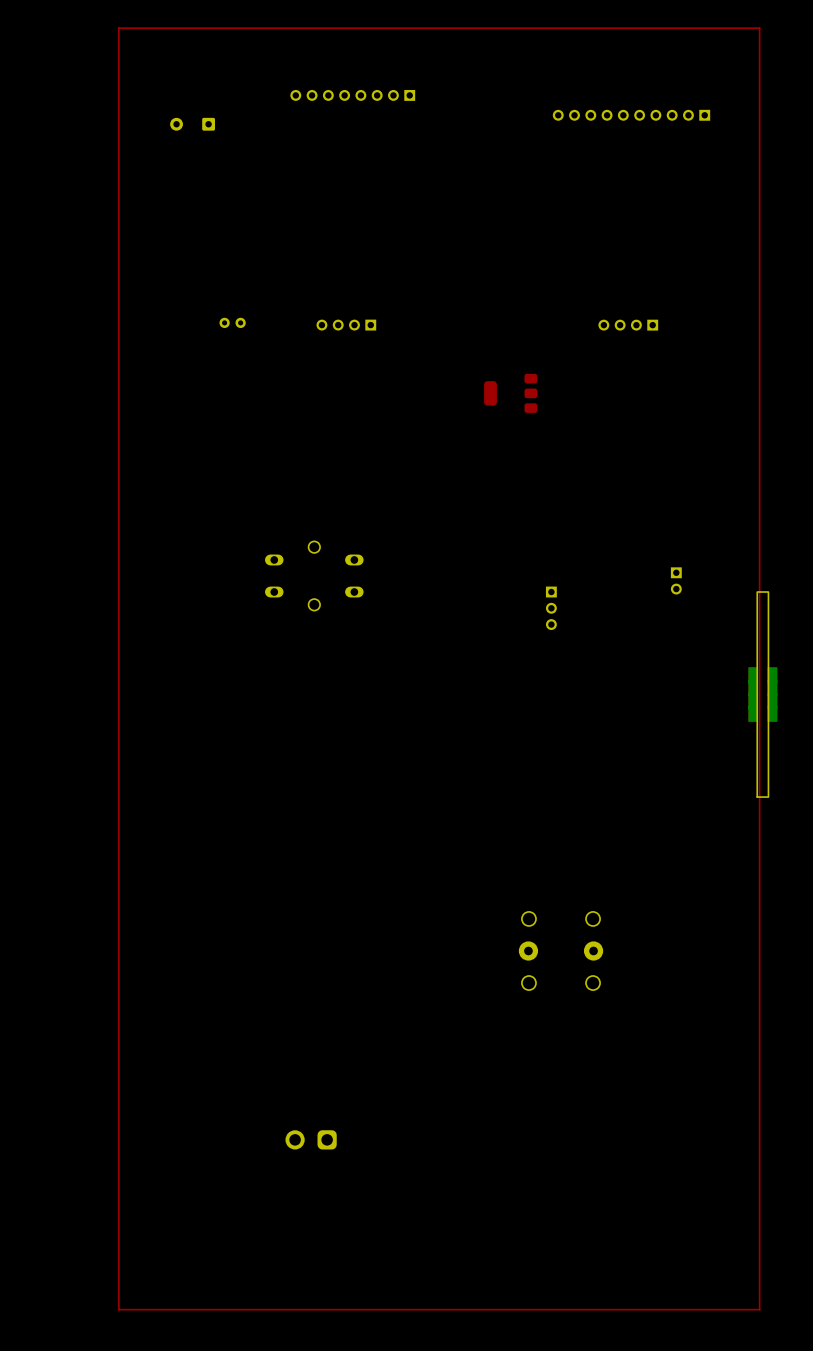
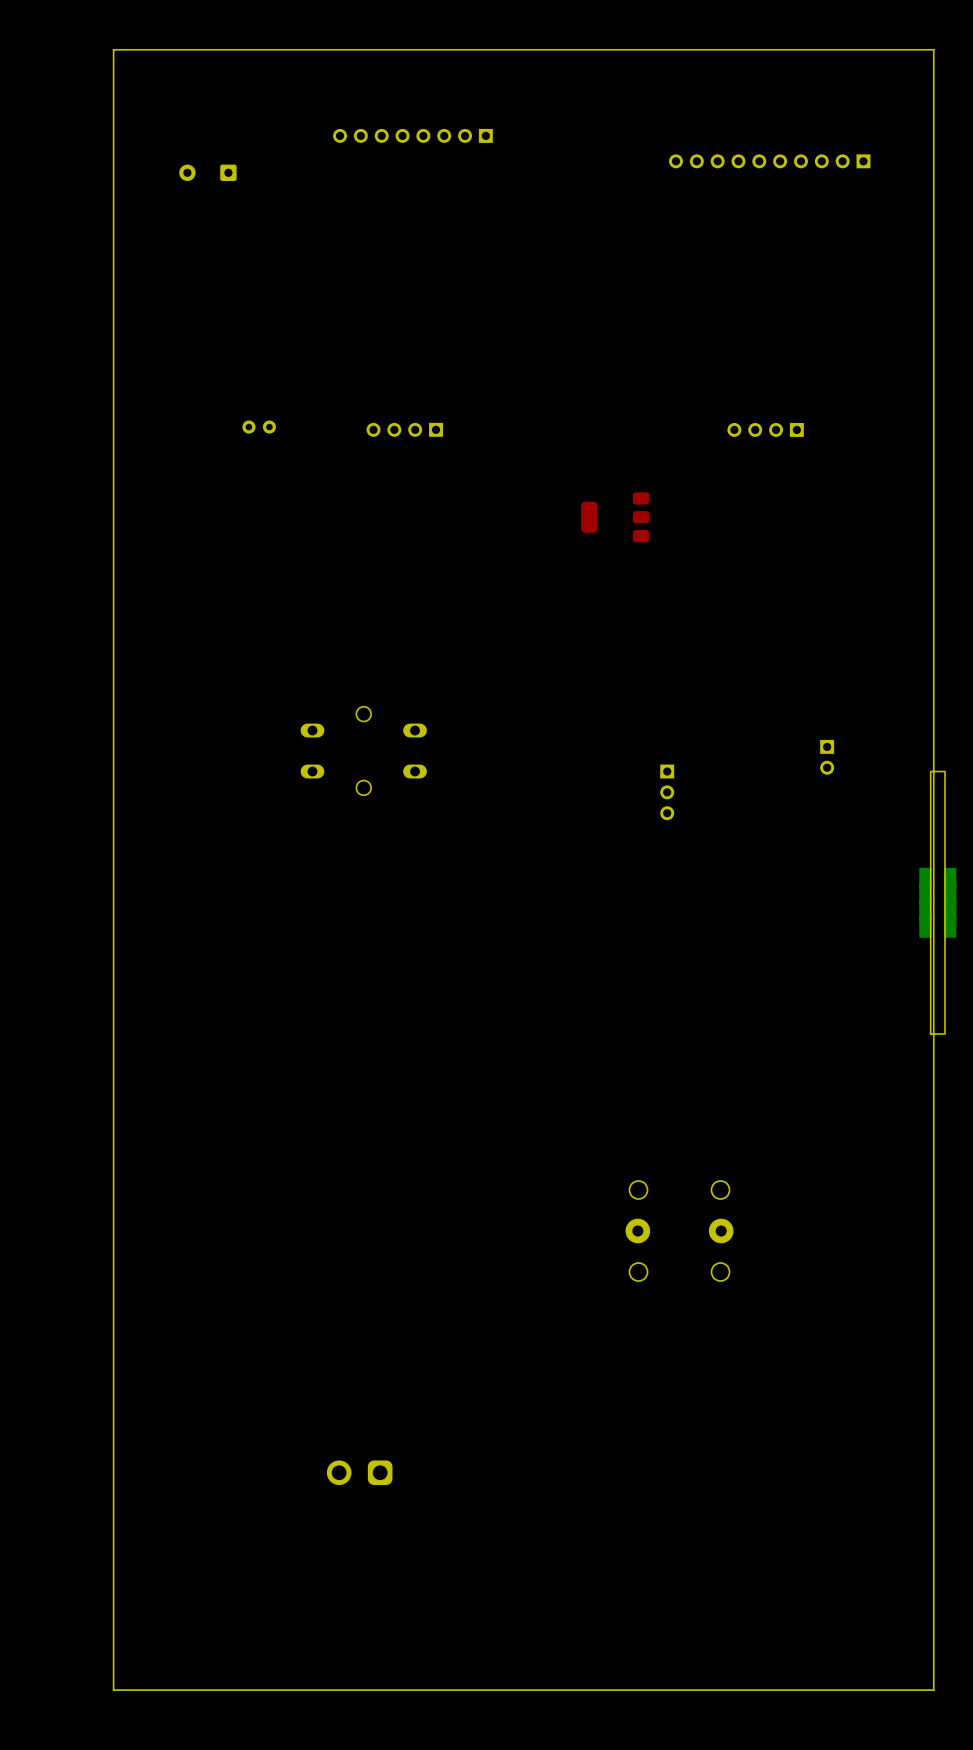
top track: (759, 28) (118, 28) (118, 1309) (759, 1309) (759, 28) -> none
board edge: none -> (933, 49) (113, 49) (113, 1690) (933, 1690) (933, 49)

